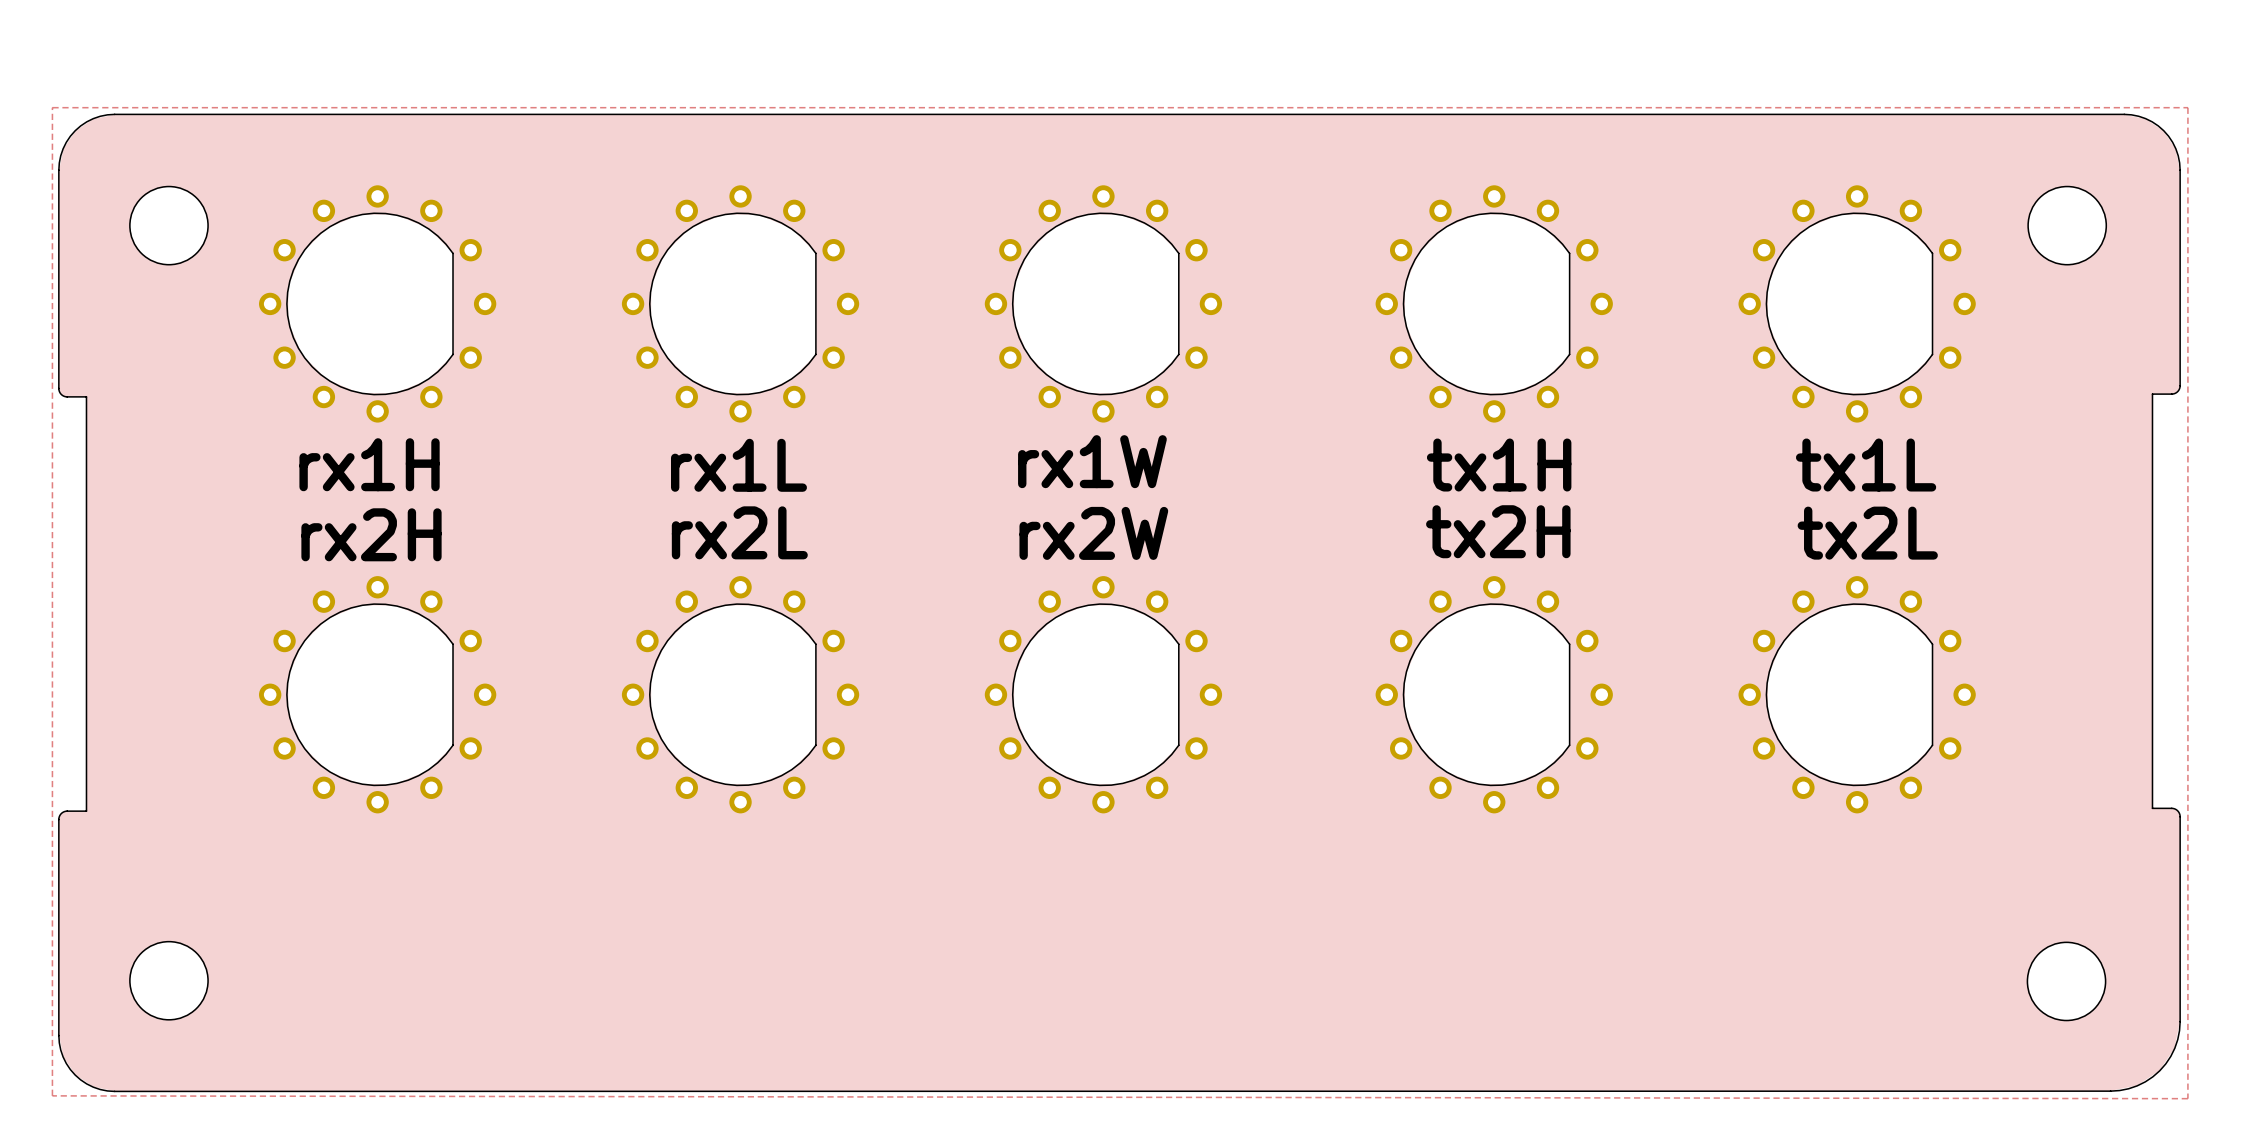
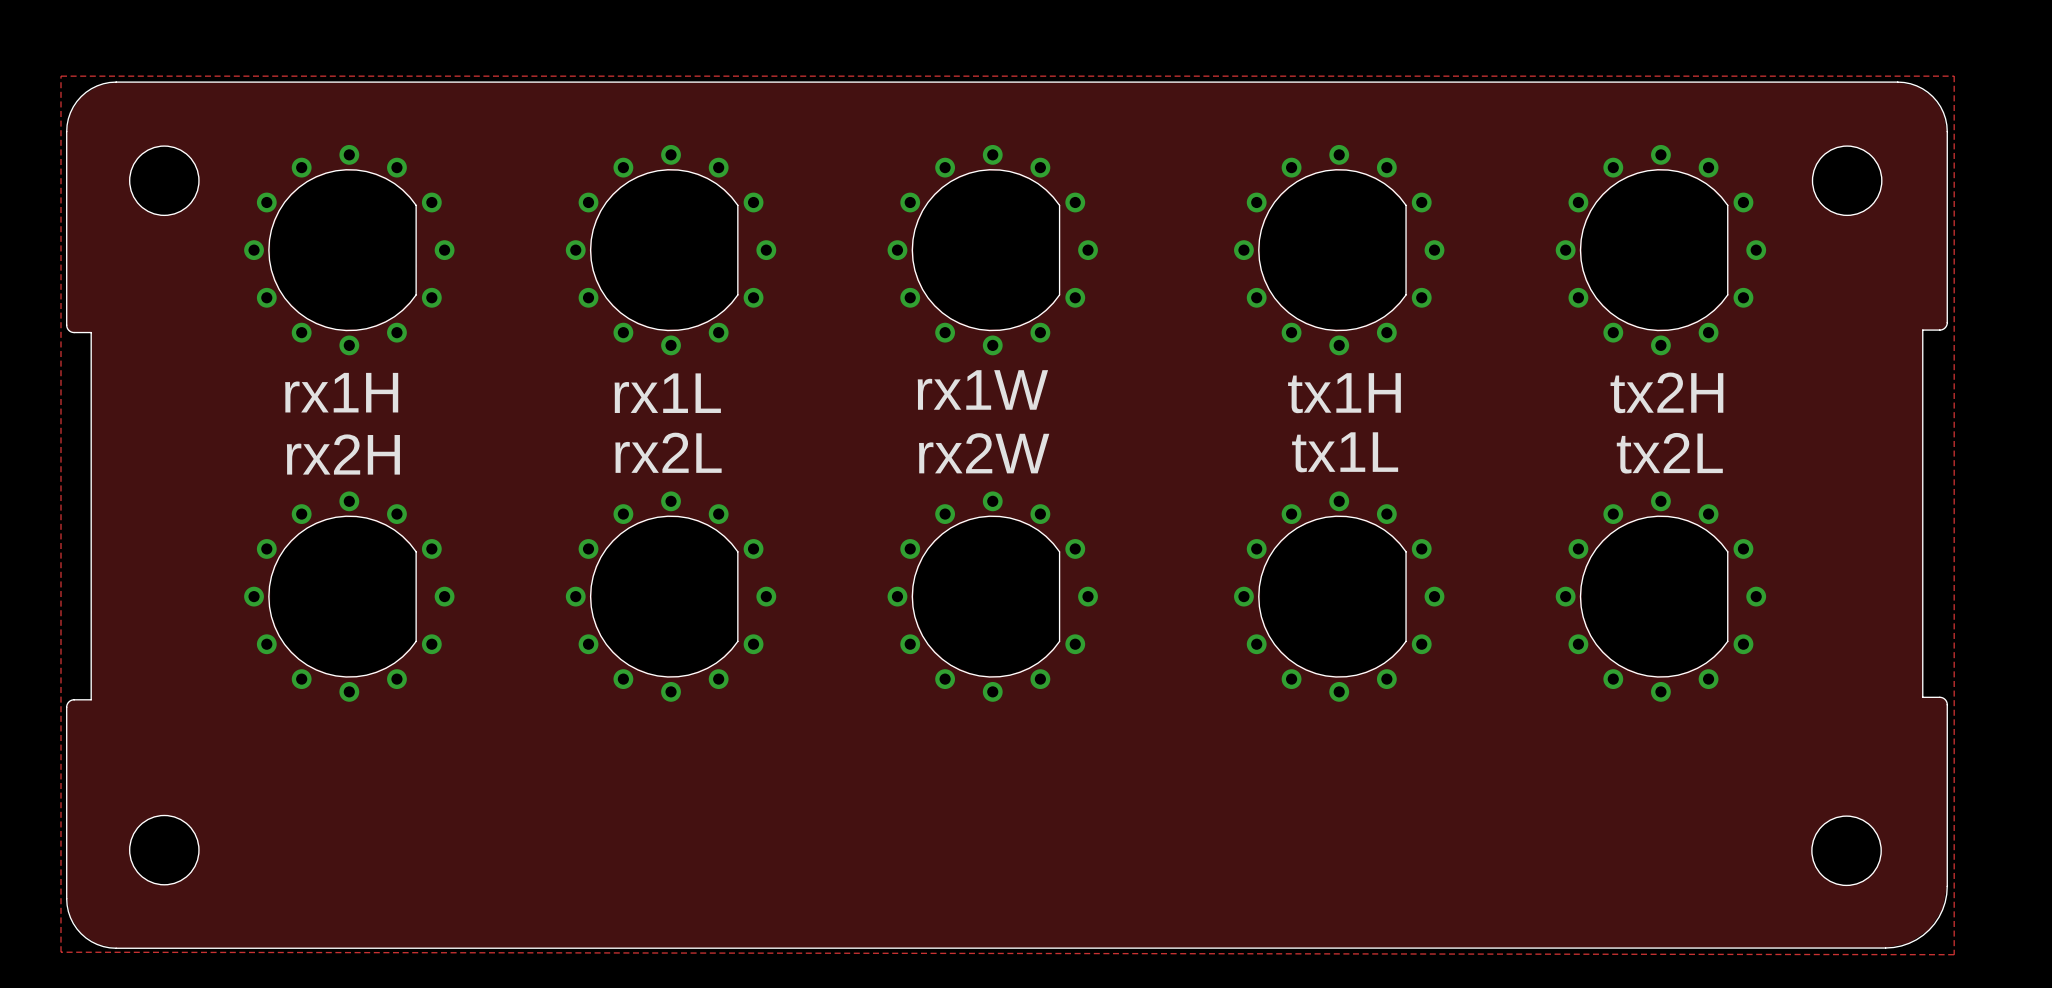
text: tx1L (1866, 465) -> tx2H (1666, 392)
text: tx2H (1498, 531) -> tx1L (1345, 452)

